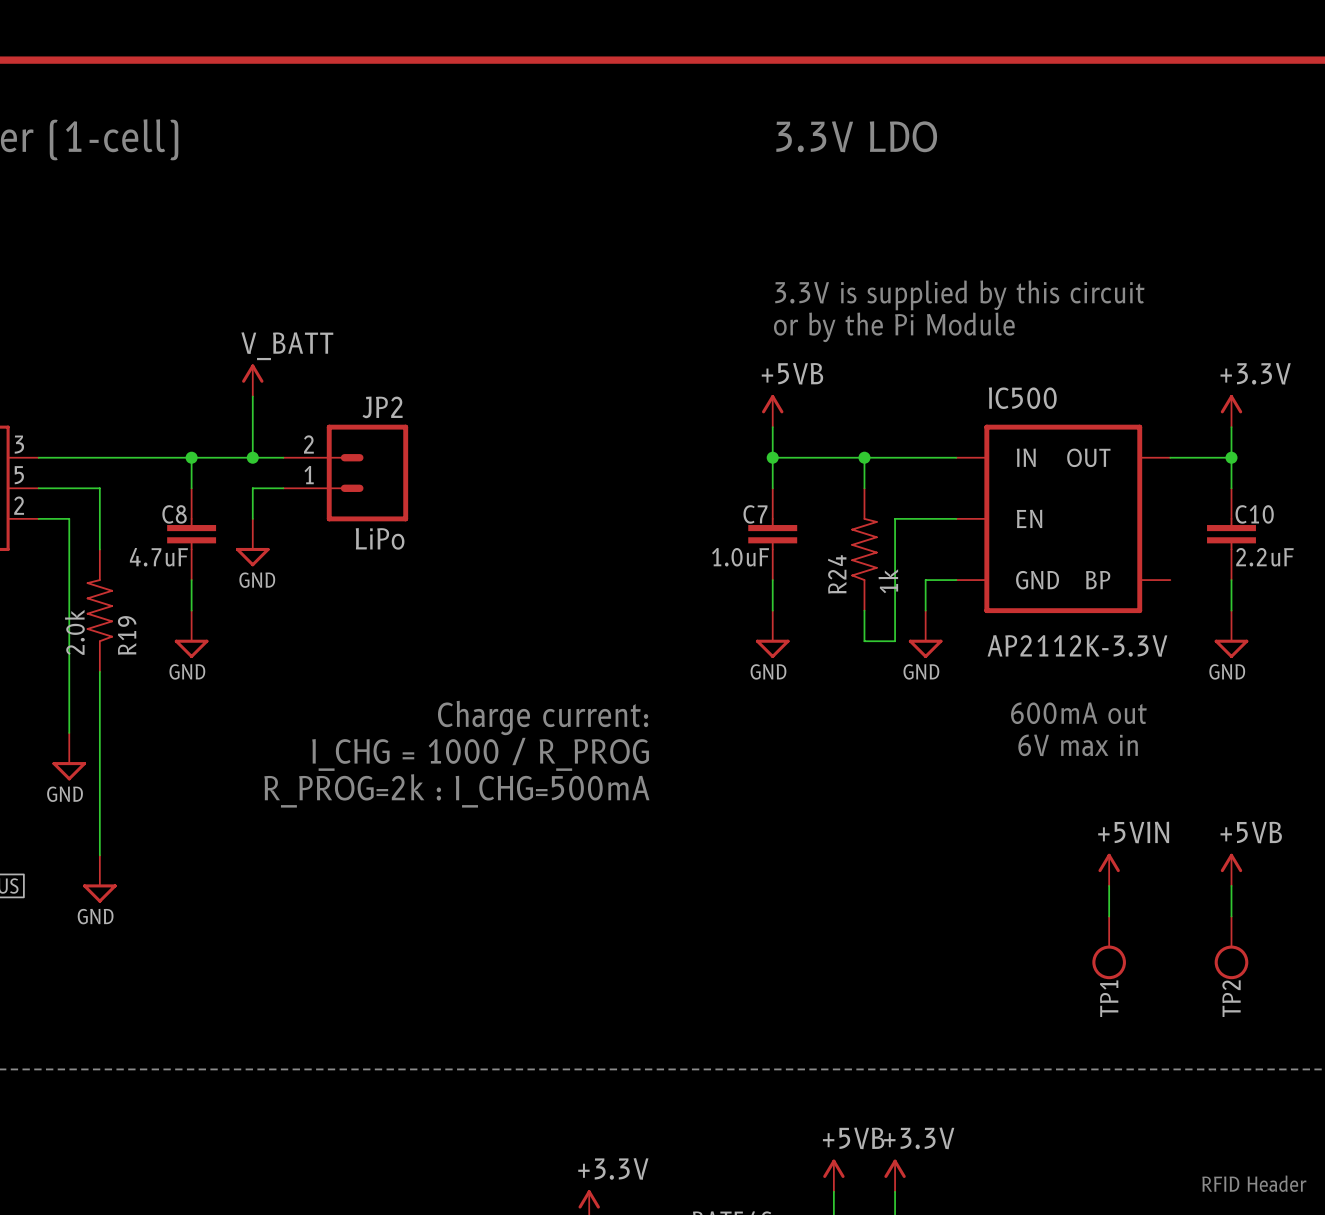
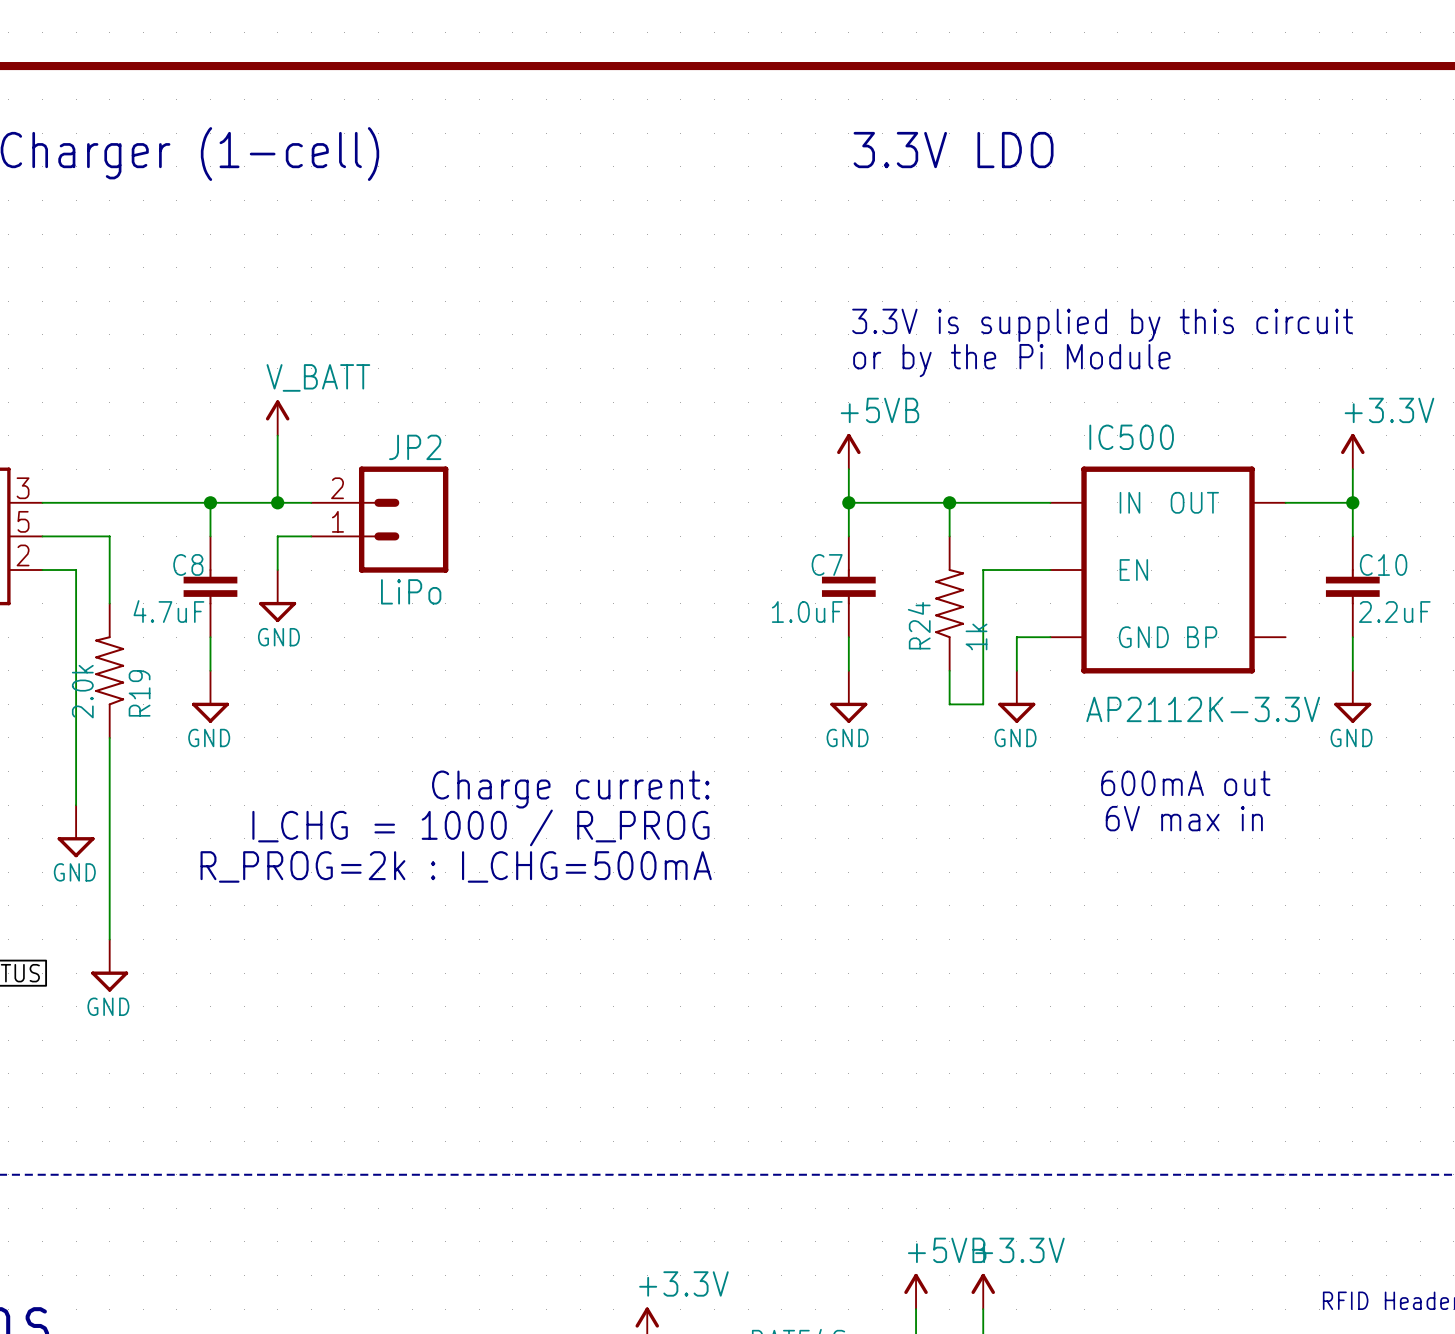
power symbol: +5VIN (1109, 869) -> none
power symbol: +5VB (1231, 869) -> none
wire: (1109, 885) (1109, 916) -> none
wire: (1231, 885) (1231, 916) -> none
TP1: (1109, 947) -> none
TP2: (1231, 947) -> none

